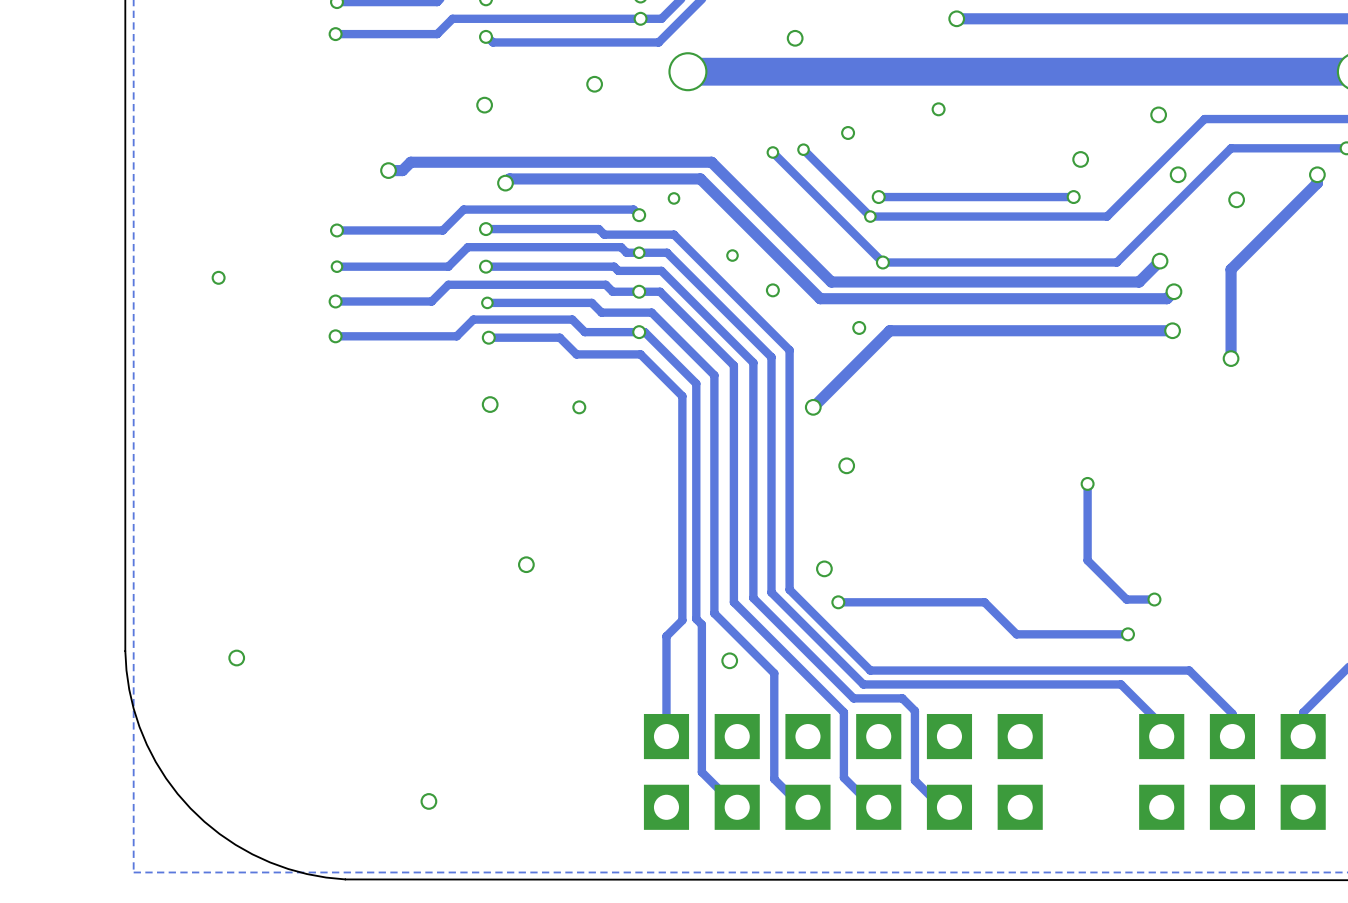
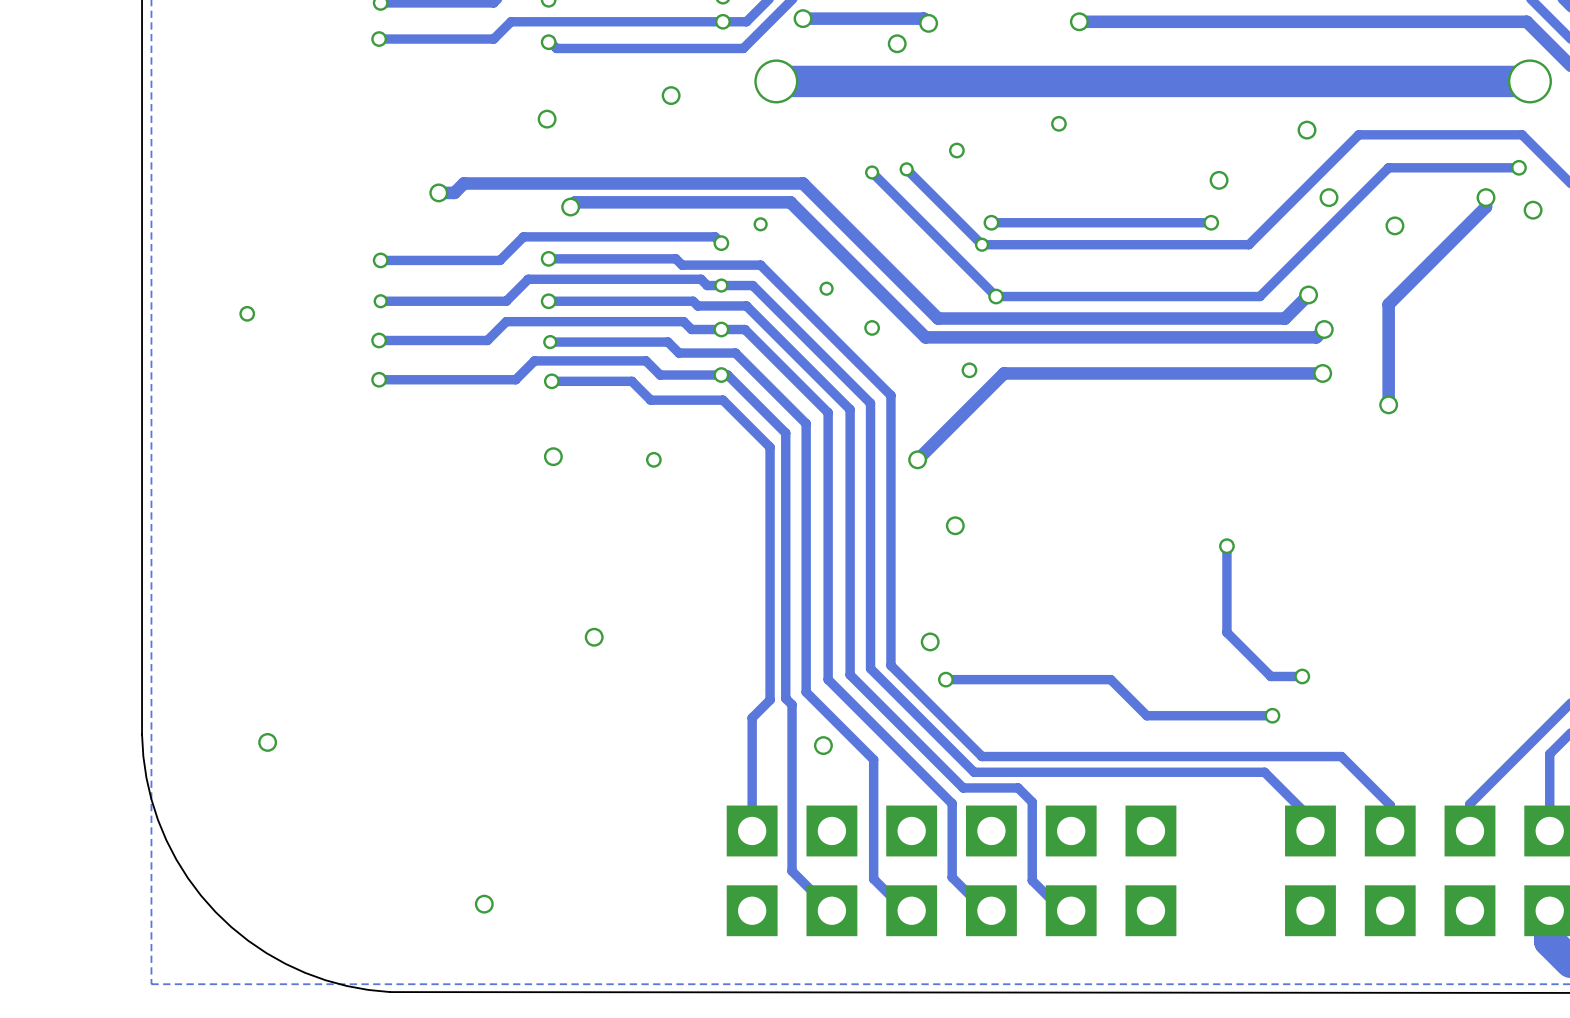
track: none -> (803, 18) (923, 18) (928, 23)
via: none -> (803, 18)
via: none -> (928, 23)

